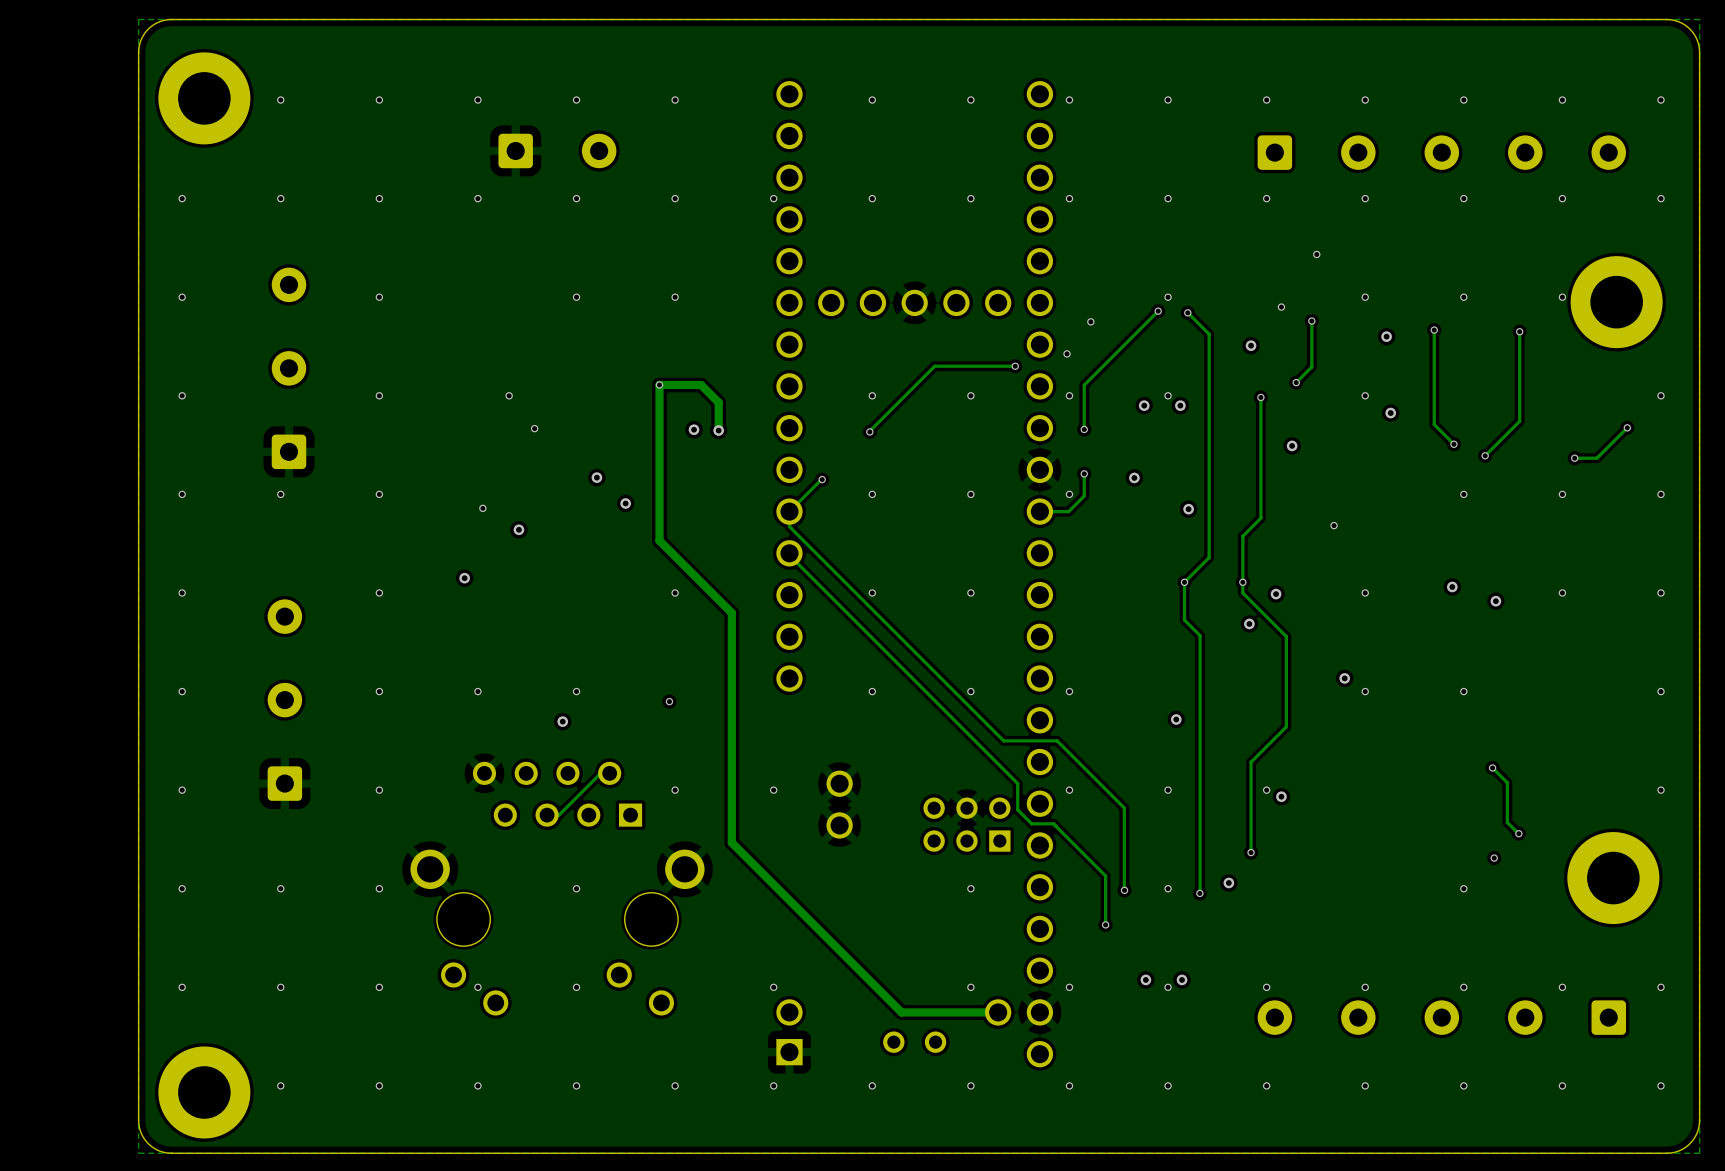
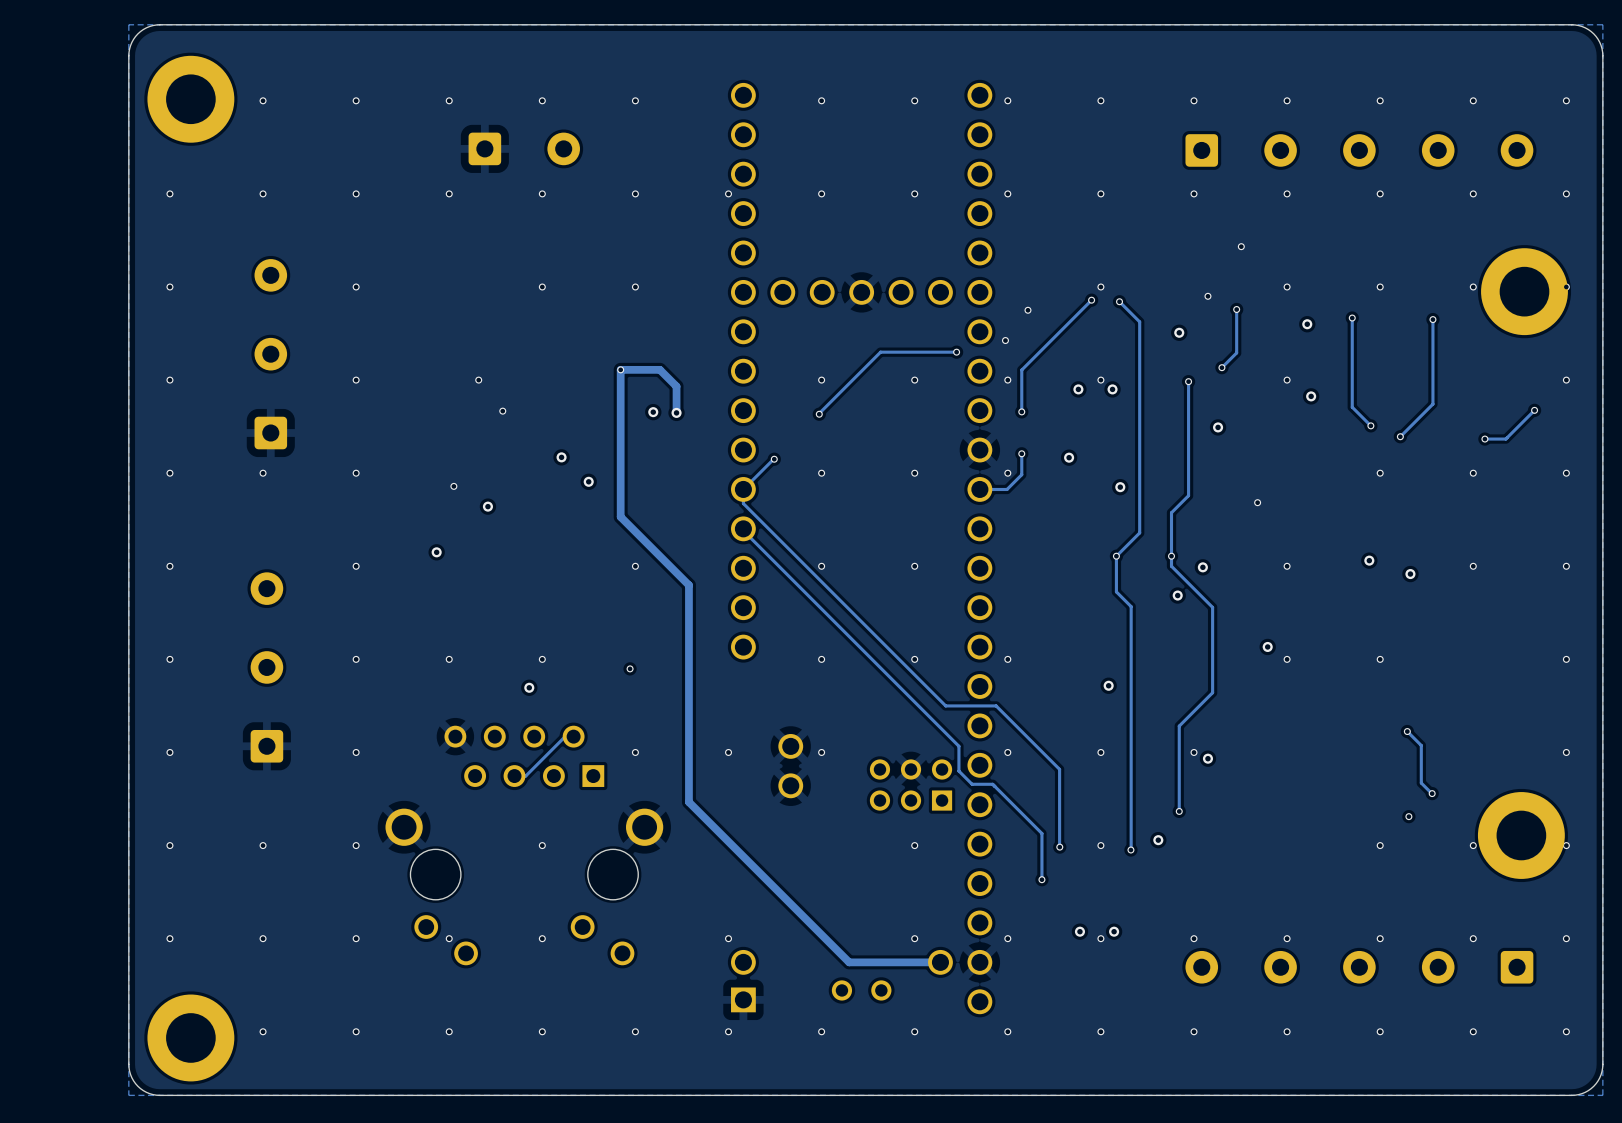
via: none -> (1566, 287)
via: none -> (821, 752)
via: none -> (1473, 845)
via: none -> (1566, 845)

